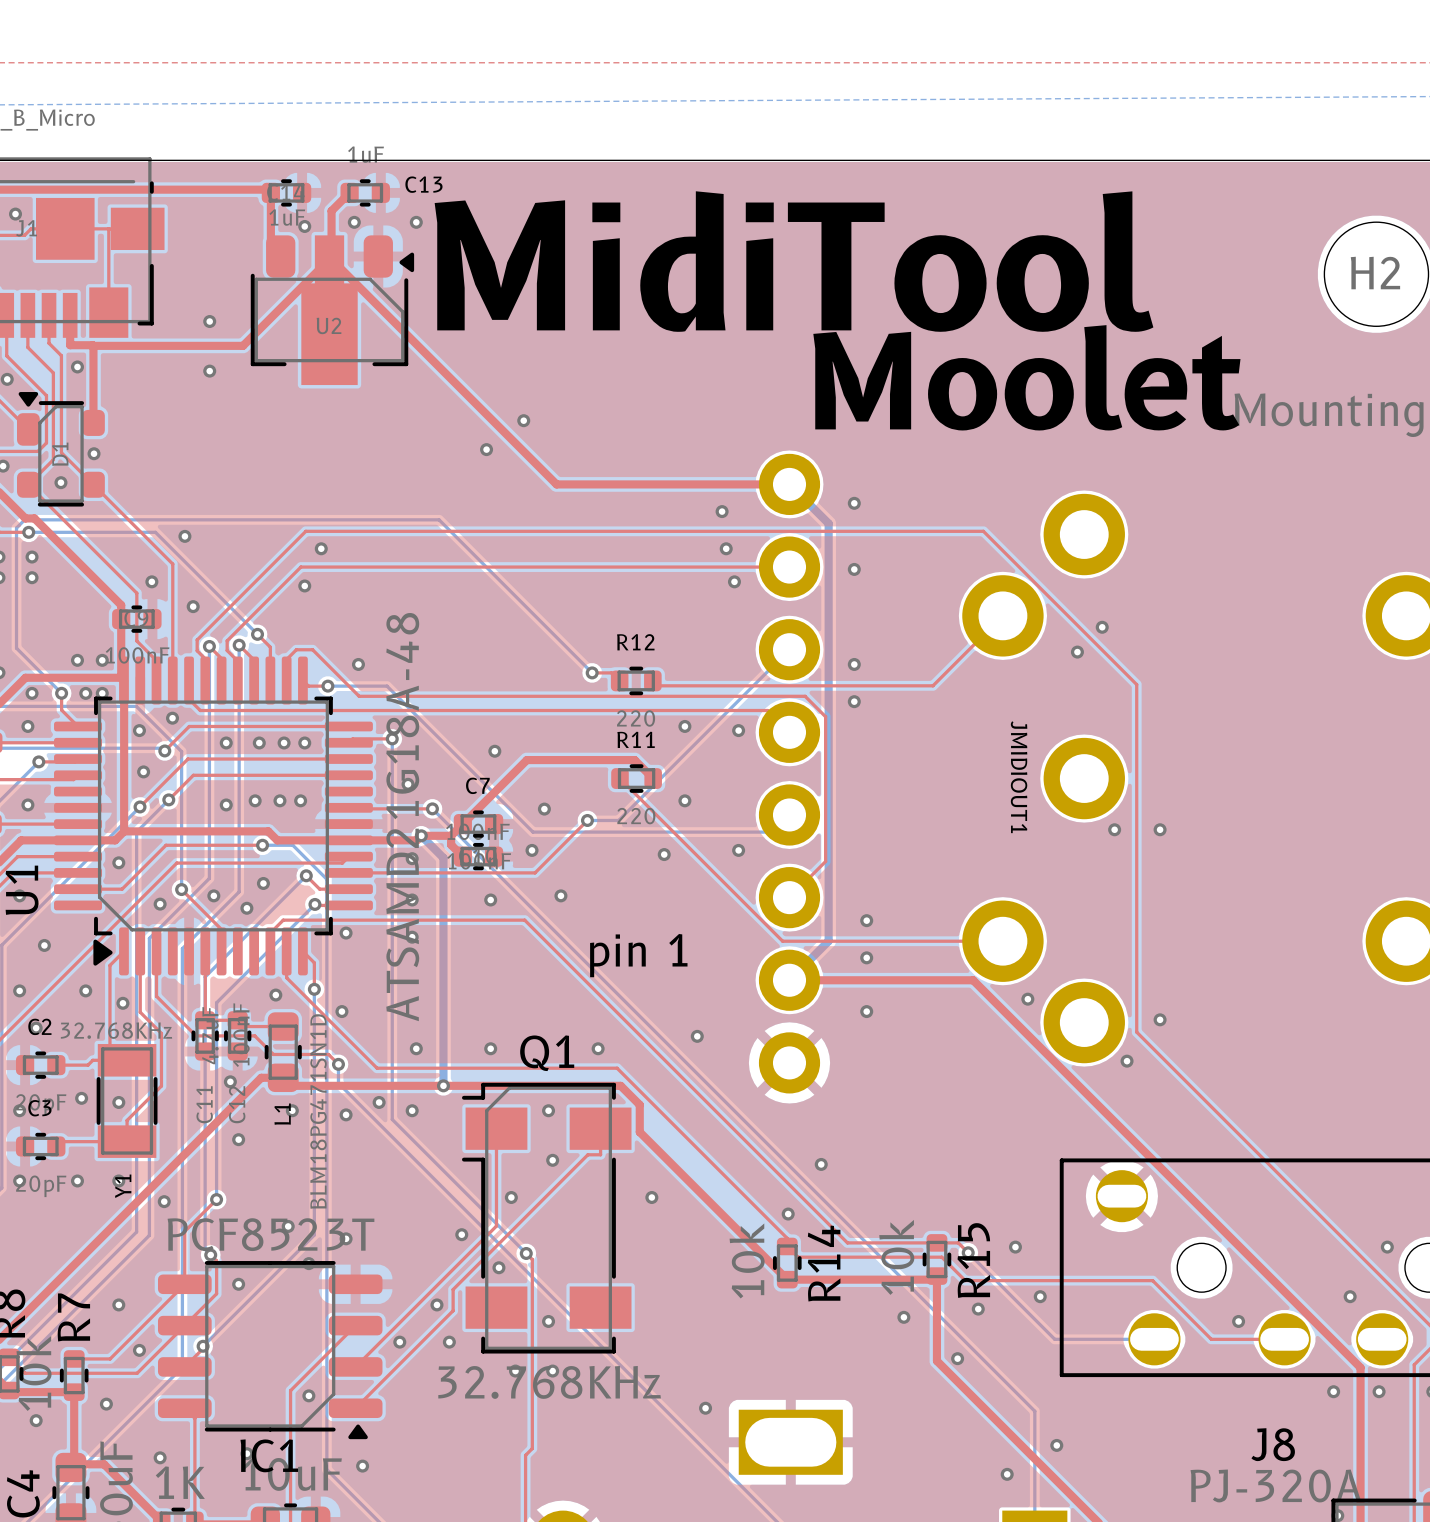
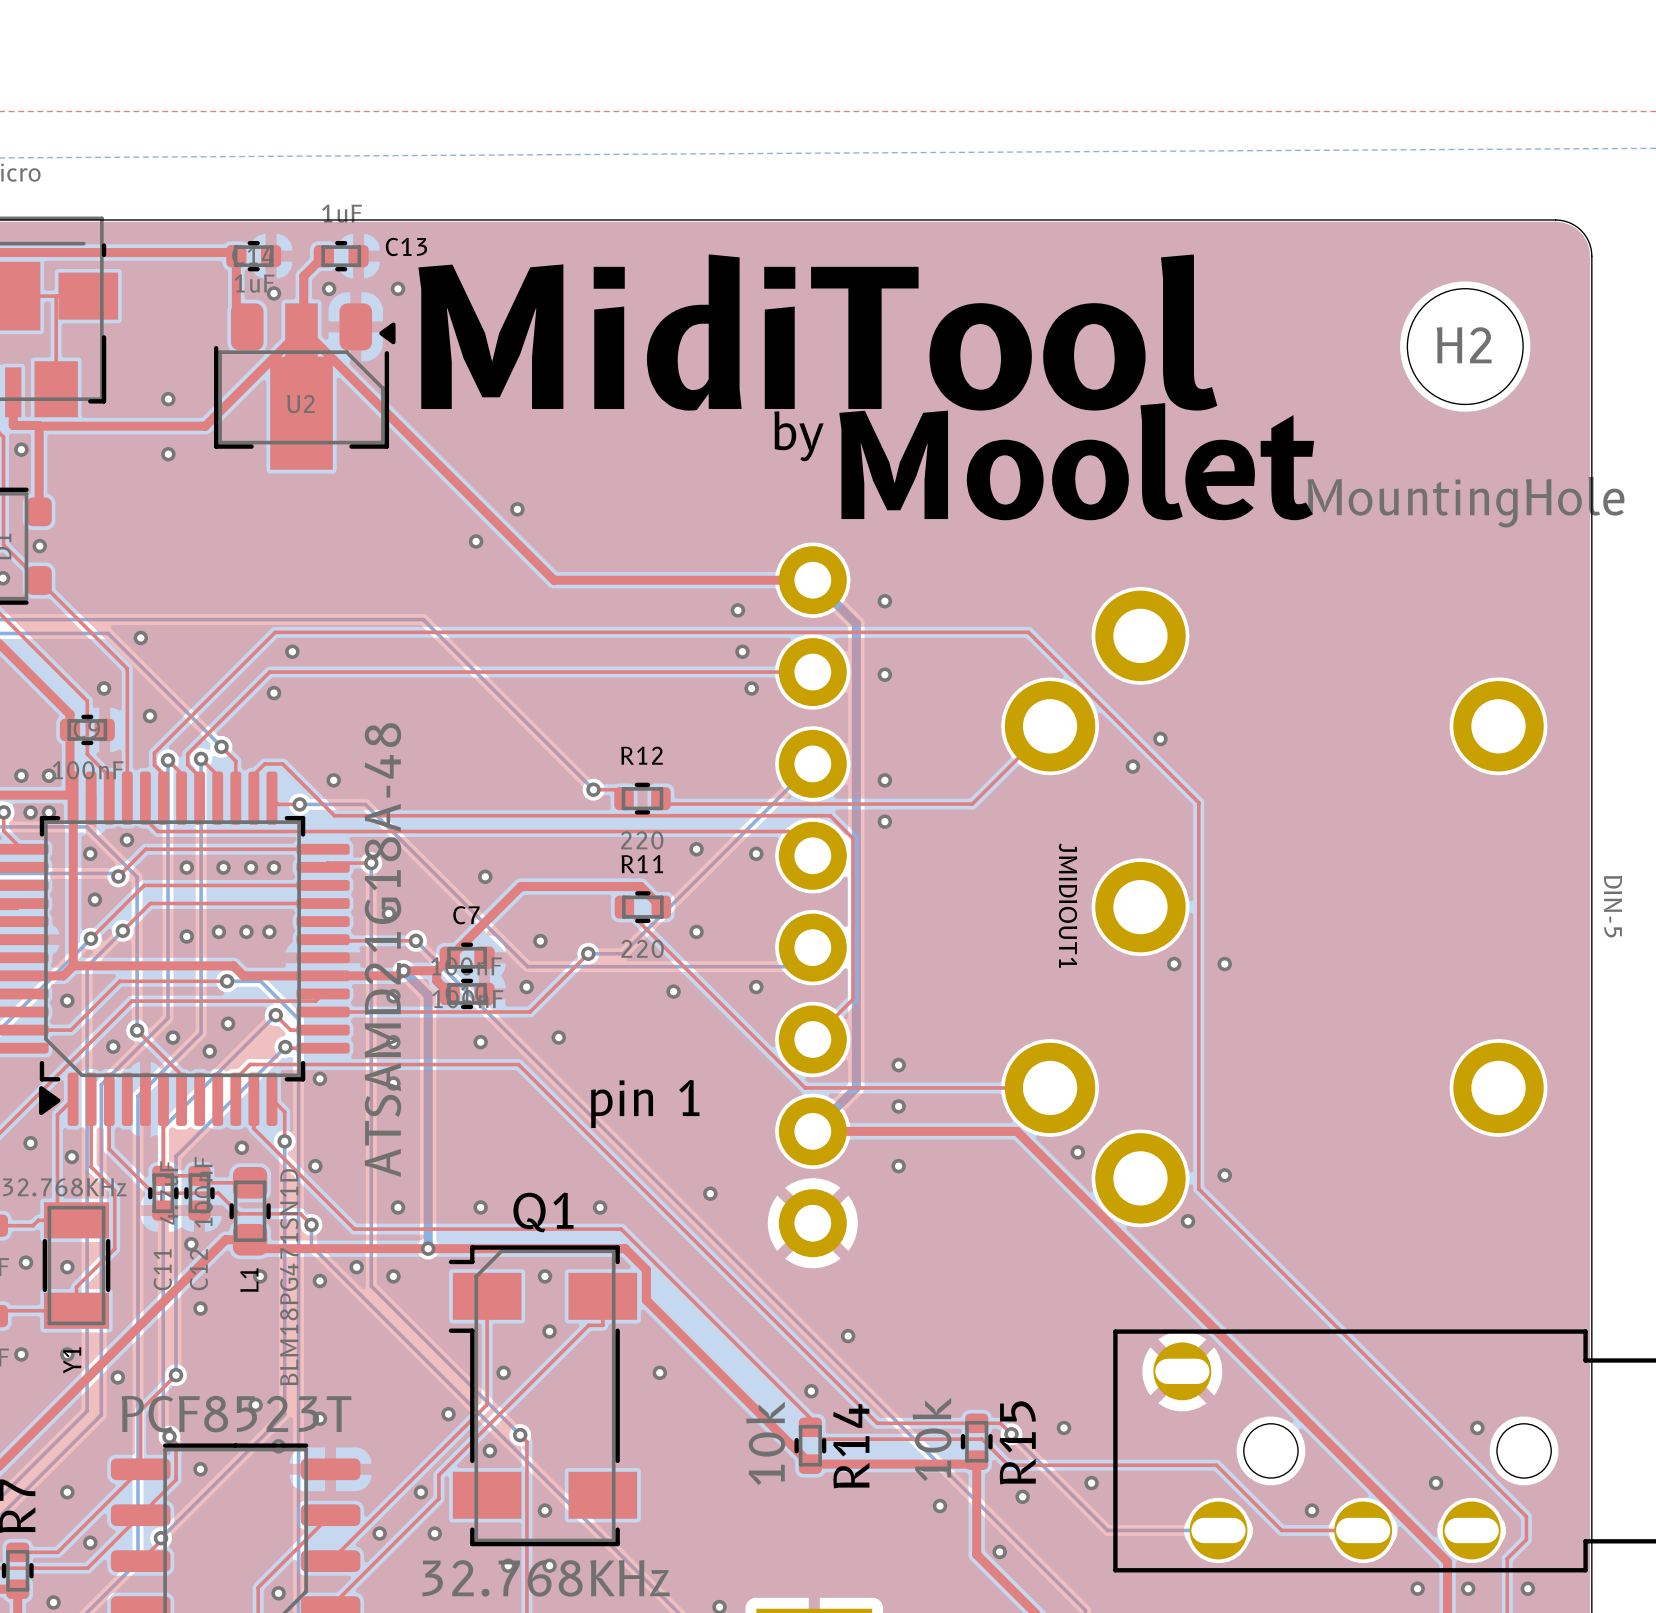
text: none -> by (798, 436)

